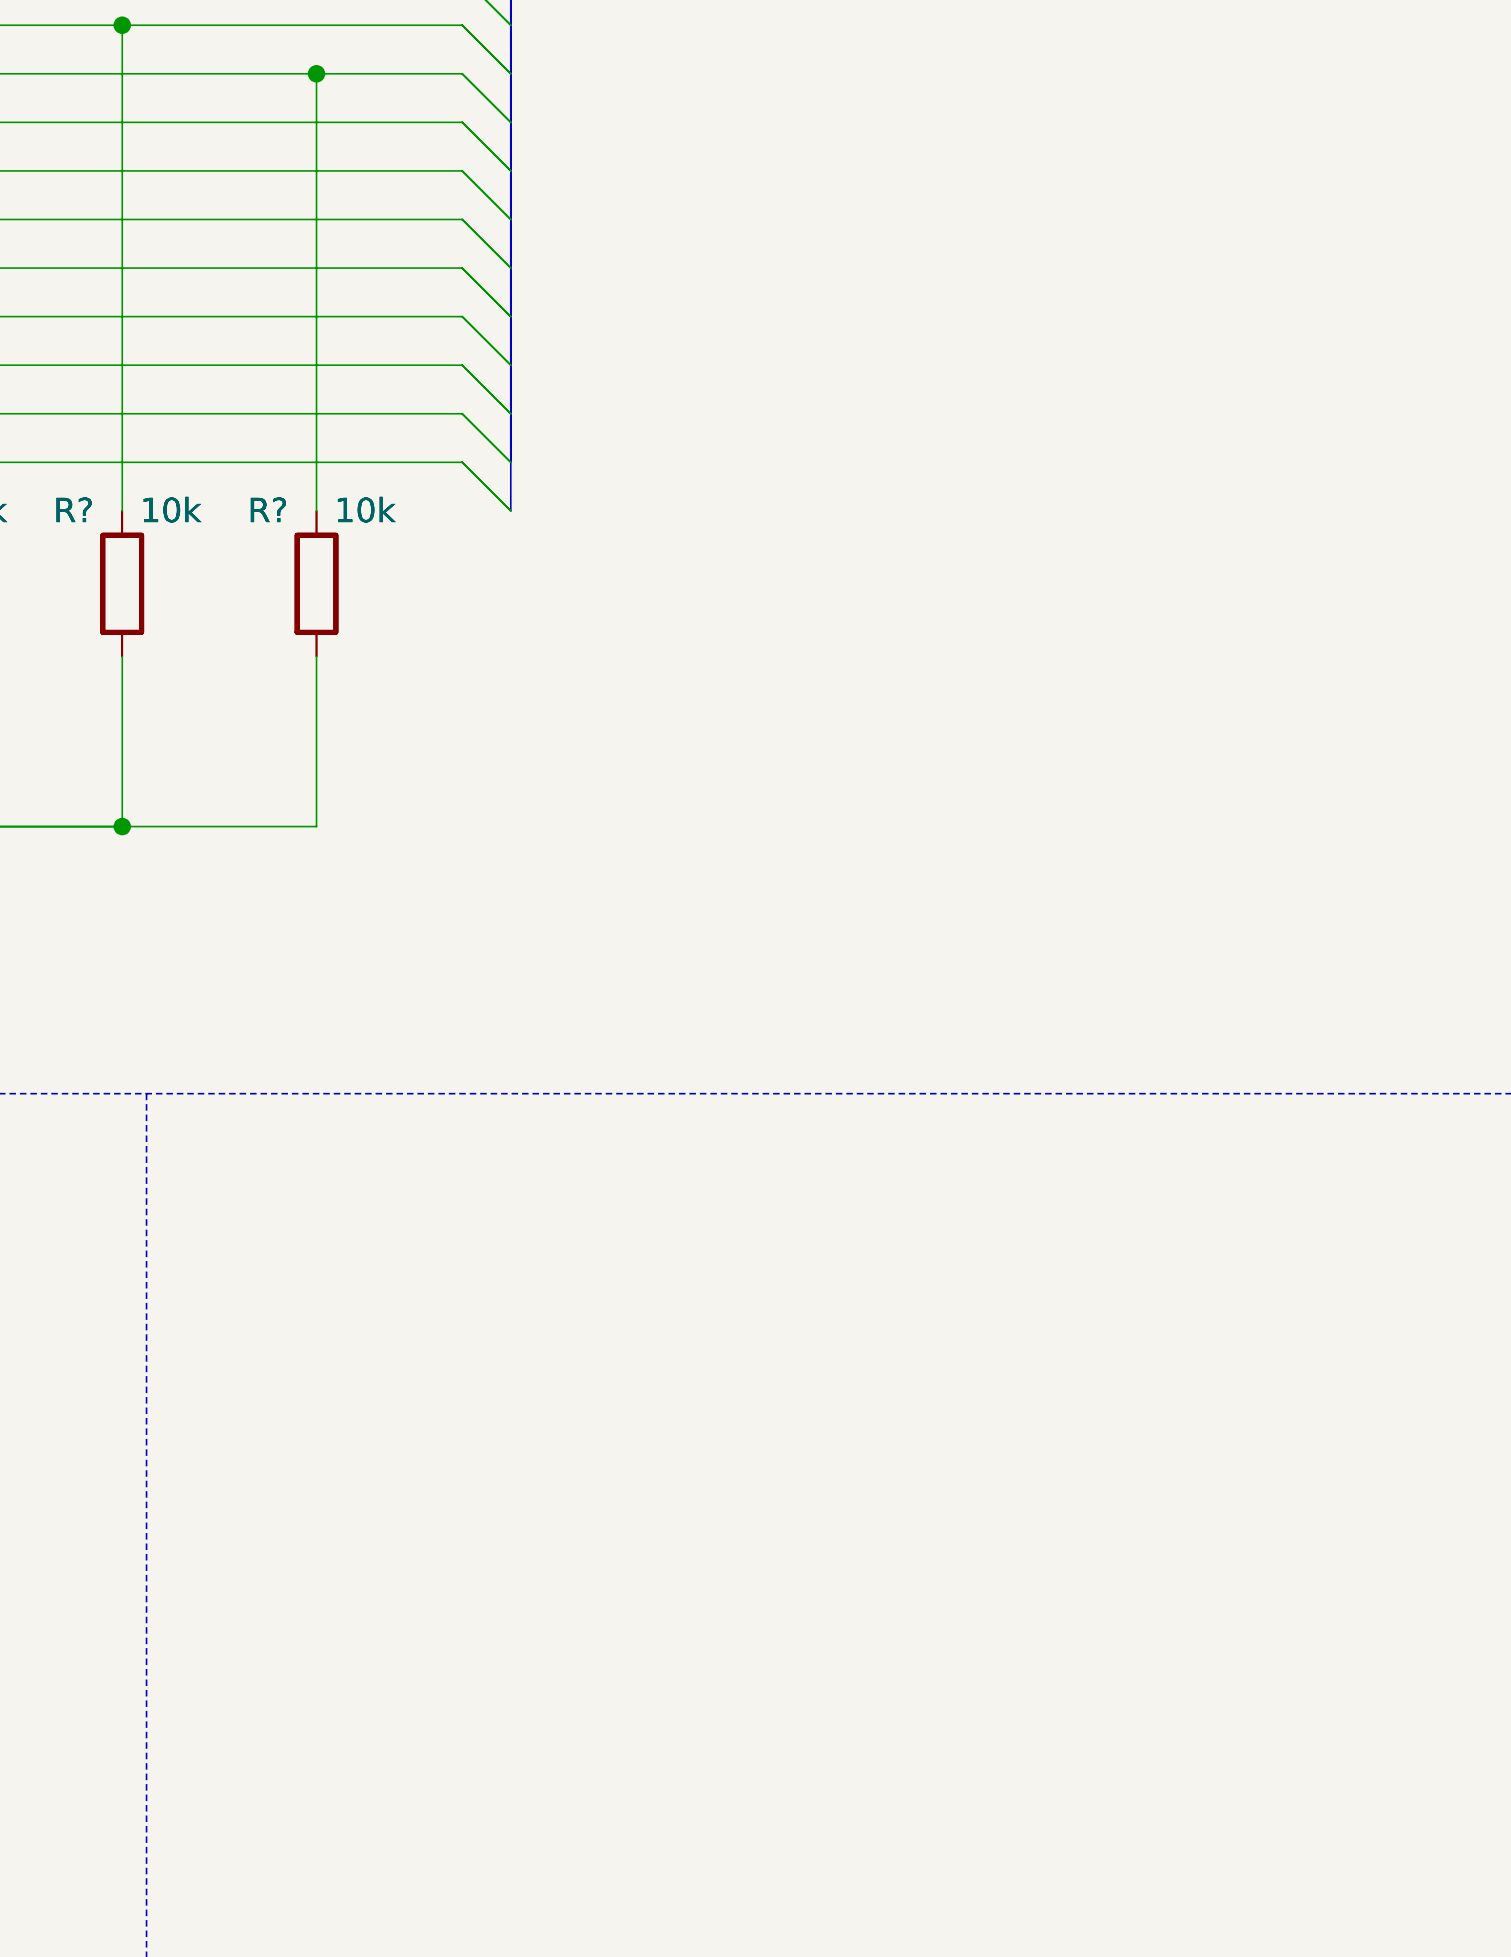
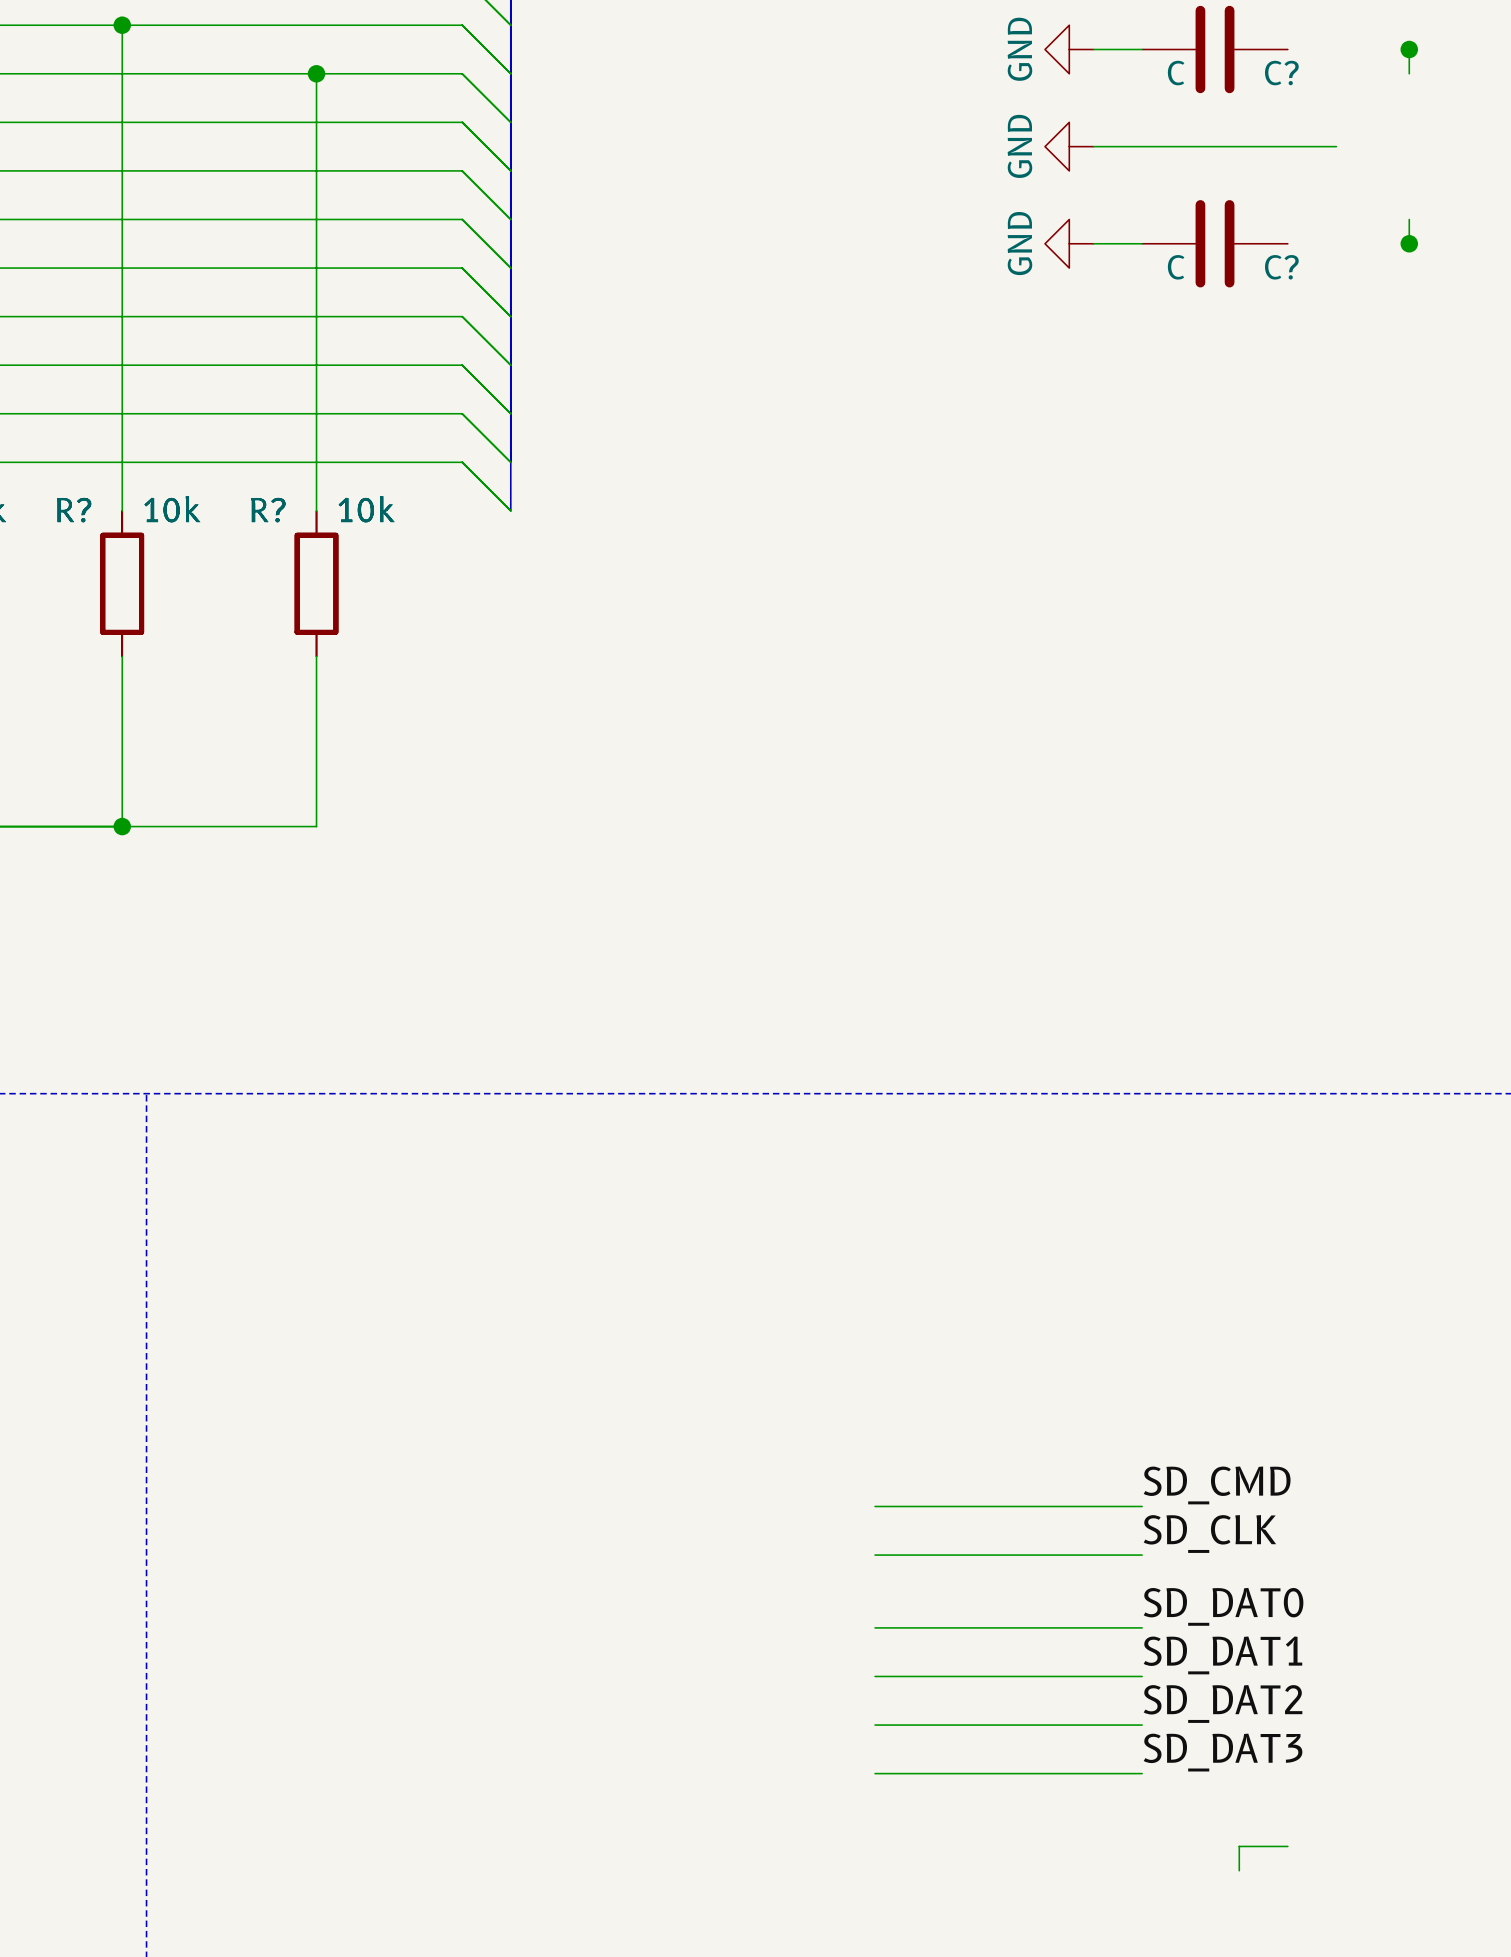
power symbol: none -> GND (1069, 49)
wire: none -> (1093, 49) (1142, 49)
C?: none -> C (1215, 49)
wire: none -> (1409, 49) (1409, 73)
junction: none -> (1409, 49)
power symbol: none -> GND (1069, 146)
wire: none -> (1093, 146) (1336, 146)
wire: none -> (1409, 219) (1409, 243)
power symbol: none -> GND (1069, 243)
wire: none -> (1093, 243) (1142, 243)
C?: none -> C (1215, 243)
junction: none -> (1409, 243)
label: none -> SD_CMD (1217, 1485)
wire: none -> (875, 1506) (1142, 1506)
label: none -> SD_CLK (1209, 1534)
wire: none -> (875, 1555) (1142, 1555)
label: none -> SD_DAT0 (1223, 1606)
wire: none -> (875, 1627) (1142, 1627)
label: none -> SD_DAT1 (1222, 1655)
wire: none -> (875, 1676) (1142, 1676)
label: none -> SD_DAT2 (1223, 1703)
wire: none -> (875, 1725) (1142, 1725)
label: none -> SD_DAT3 (1223, 1752)
wire: none -> (875, 1773) (1142, 1773)
wire: none -> (1287, 1846) (1239, 1846) (1239, 1870)

